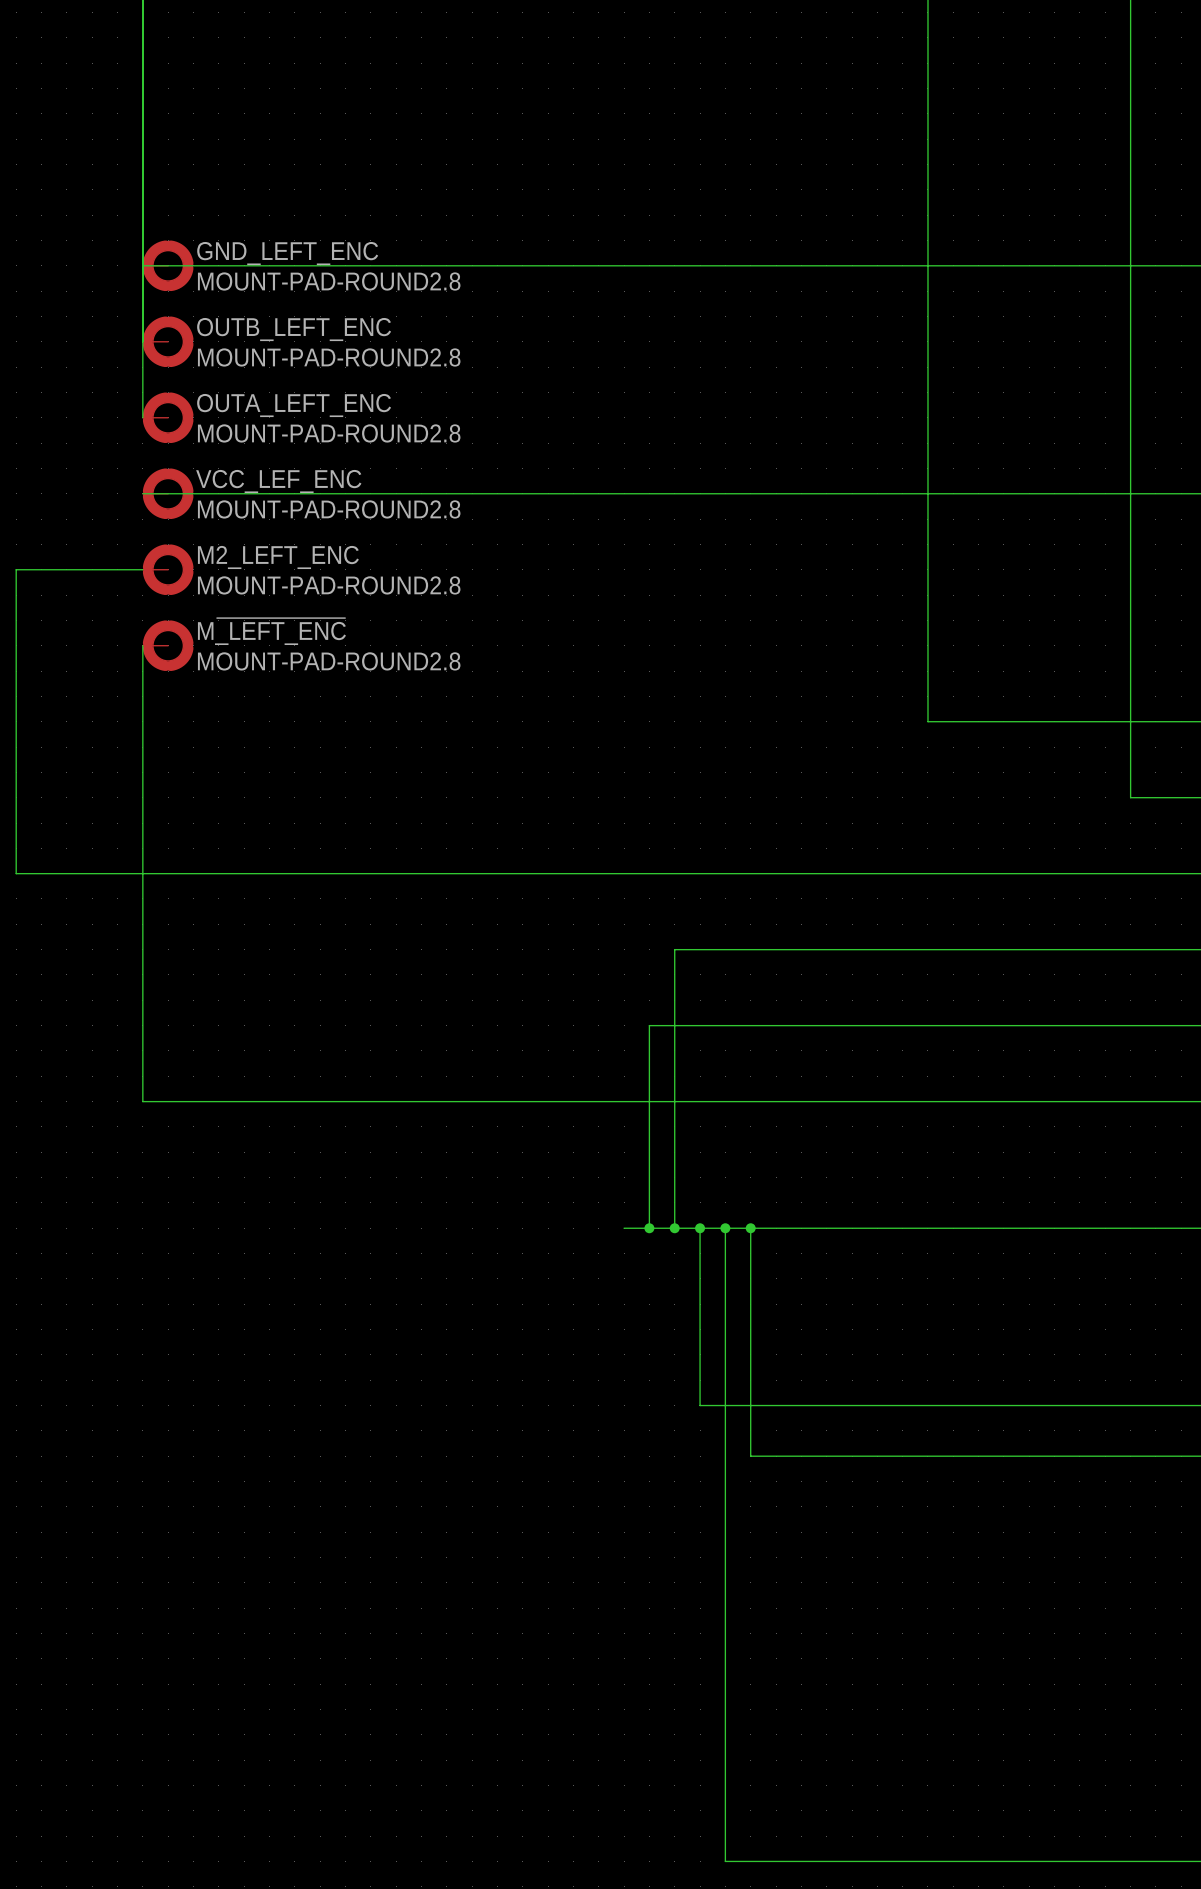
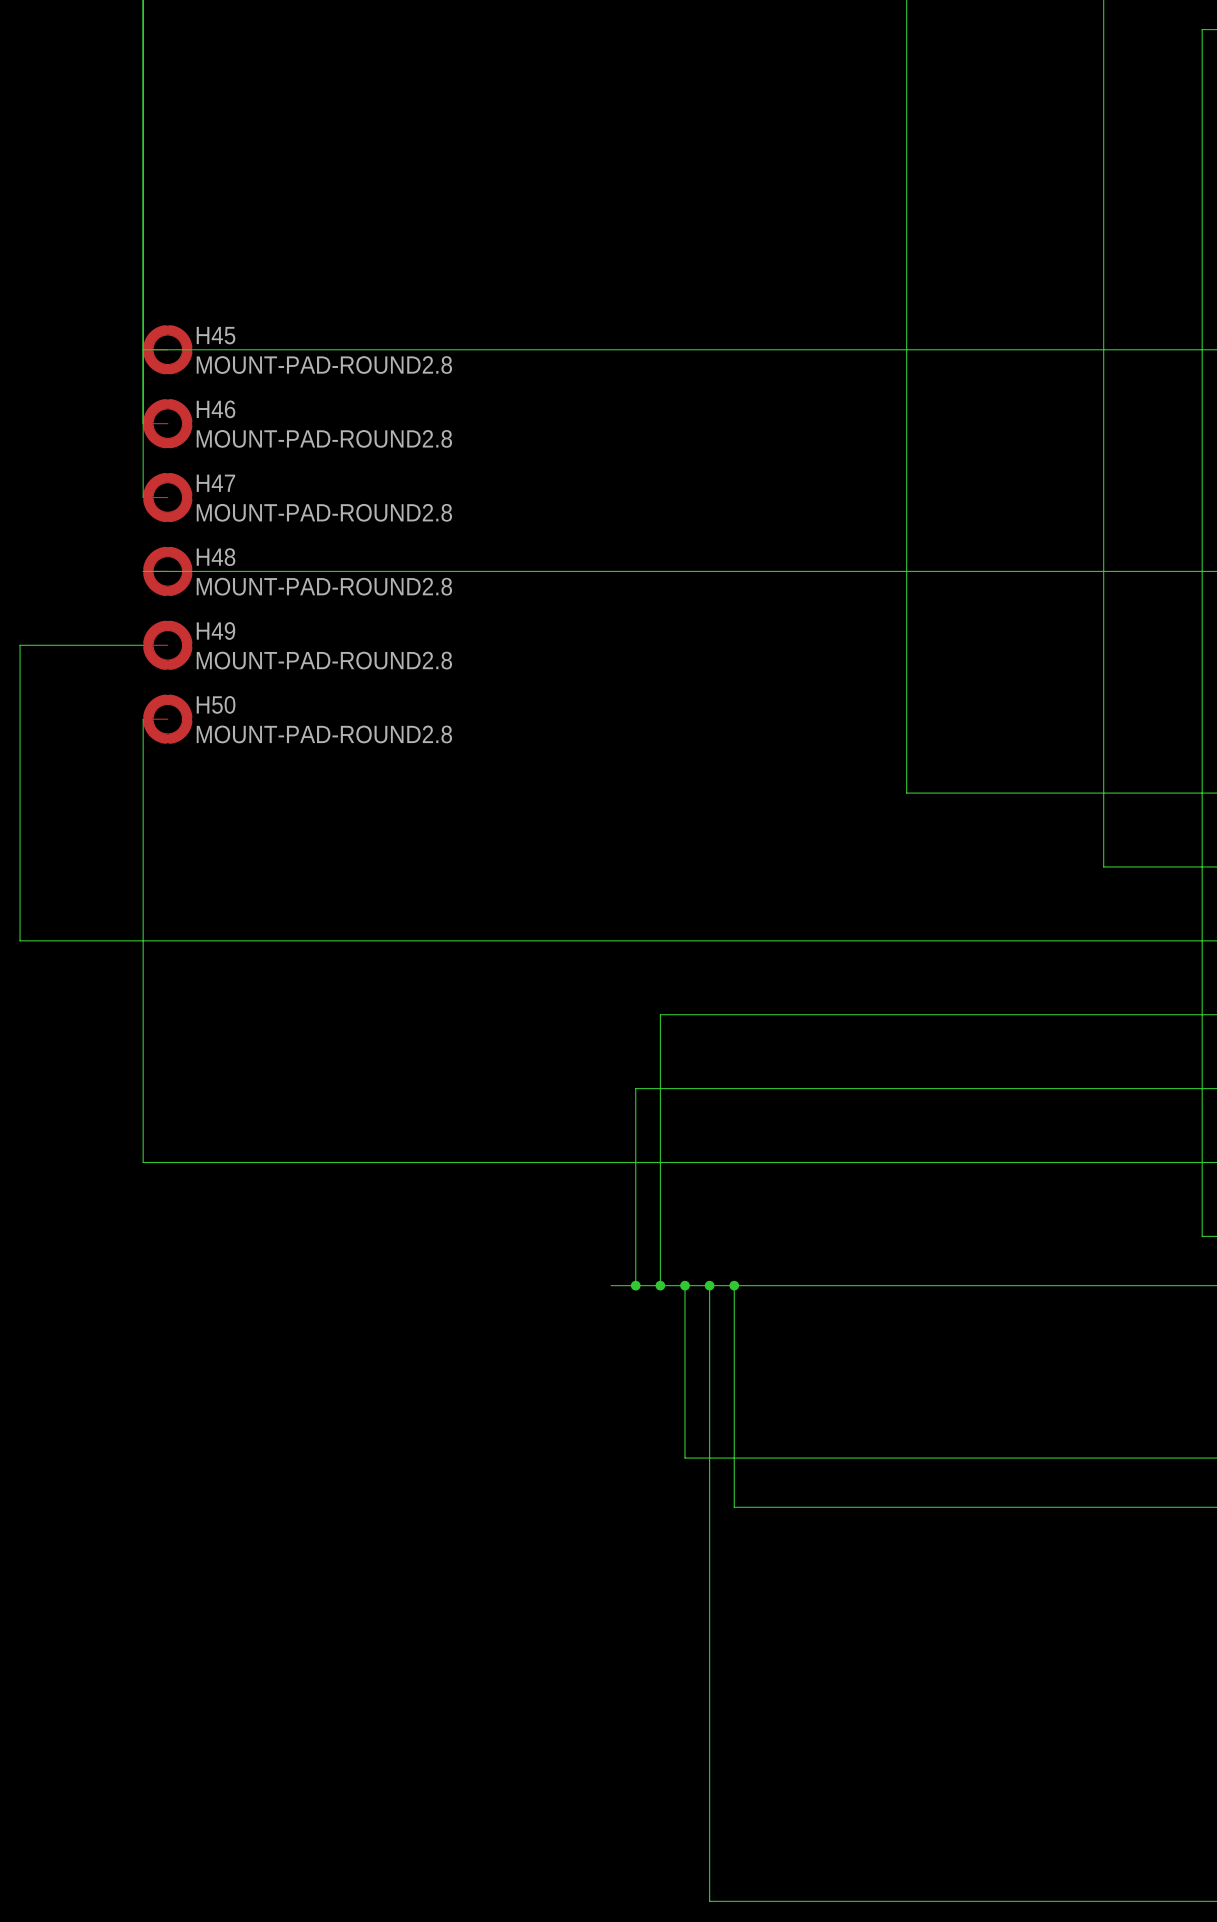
GND_LEFT_ENC name: GND_LEFT_ENC (287, 253) -> H45 (216, 335)
OUTB_LEFT_ENC name: OUTB_LEFT_ENC (294, 329) -> H46 (216, 409)
OUTA_LEFT_ENC name: OUTA_LEFT_ENC (294, 405) -> H47 (215, 483)
VCC_LEF_ENC name: VCC_LEF_ENC (278, 481) -> H48 (216, 557)
M2_LEFT_ENC name: M2_LEFT_ENC (278, 557) -> H49 (215, 631)
M~{_LEFT_ENC} name: M~{_LEFT_ENC} (271, 631) -> H50 (216, 704)

